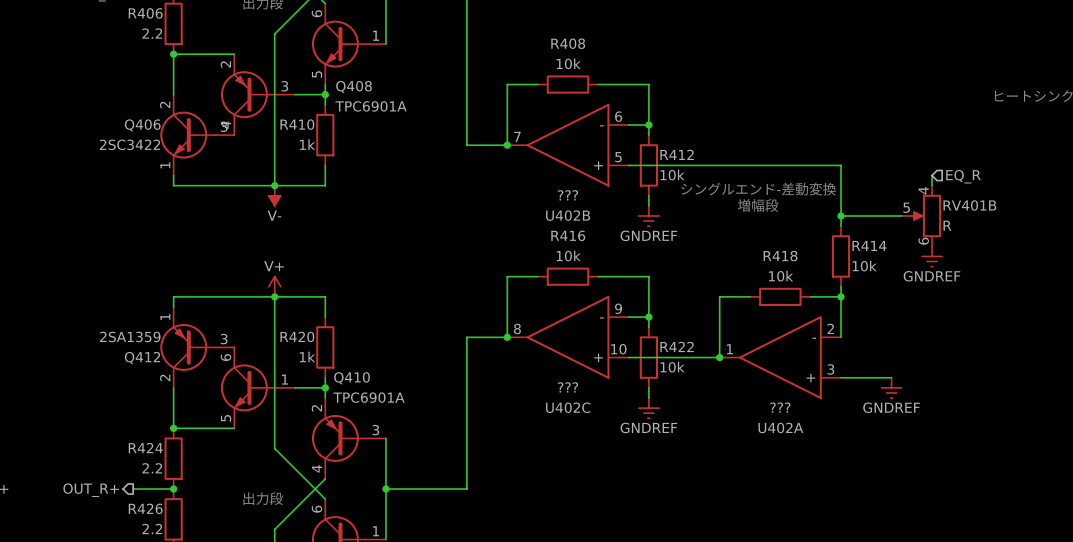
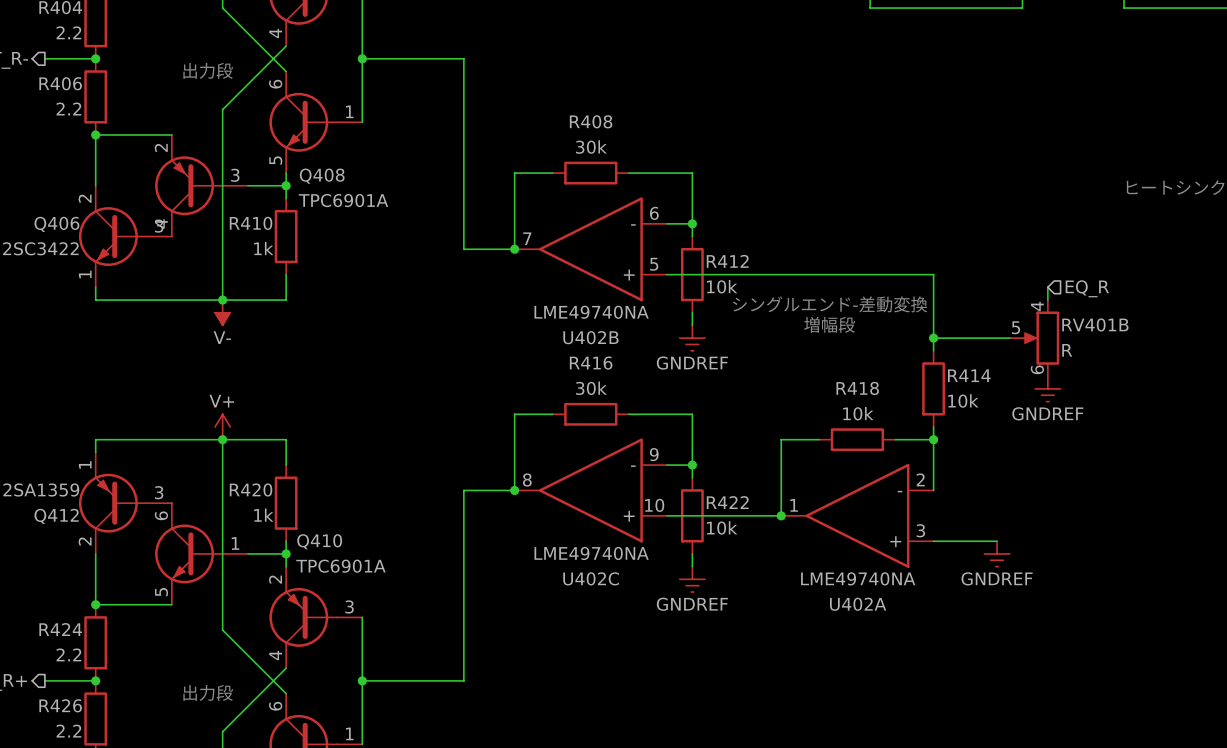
R408 value: 10k (568, 63) -> 30k (591, 147)
U402B value: ??? (568, 195) -> LME49740NA (591, 312)
R416 value: 10k (568, 255) -> 30k (591, 388)
U402C value: ??? (568, 387) -> LME49740NA (591, 553)
U402A value: ??? (780, 407) -> LME49740NA (858, 578)

